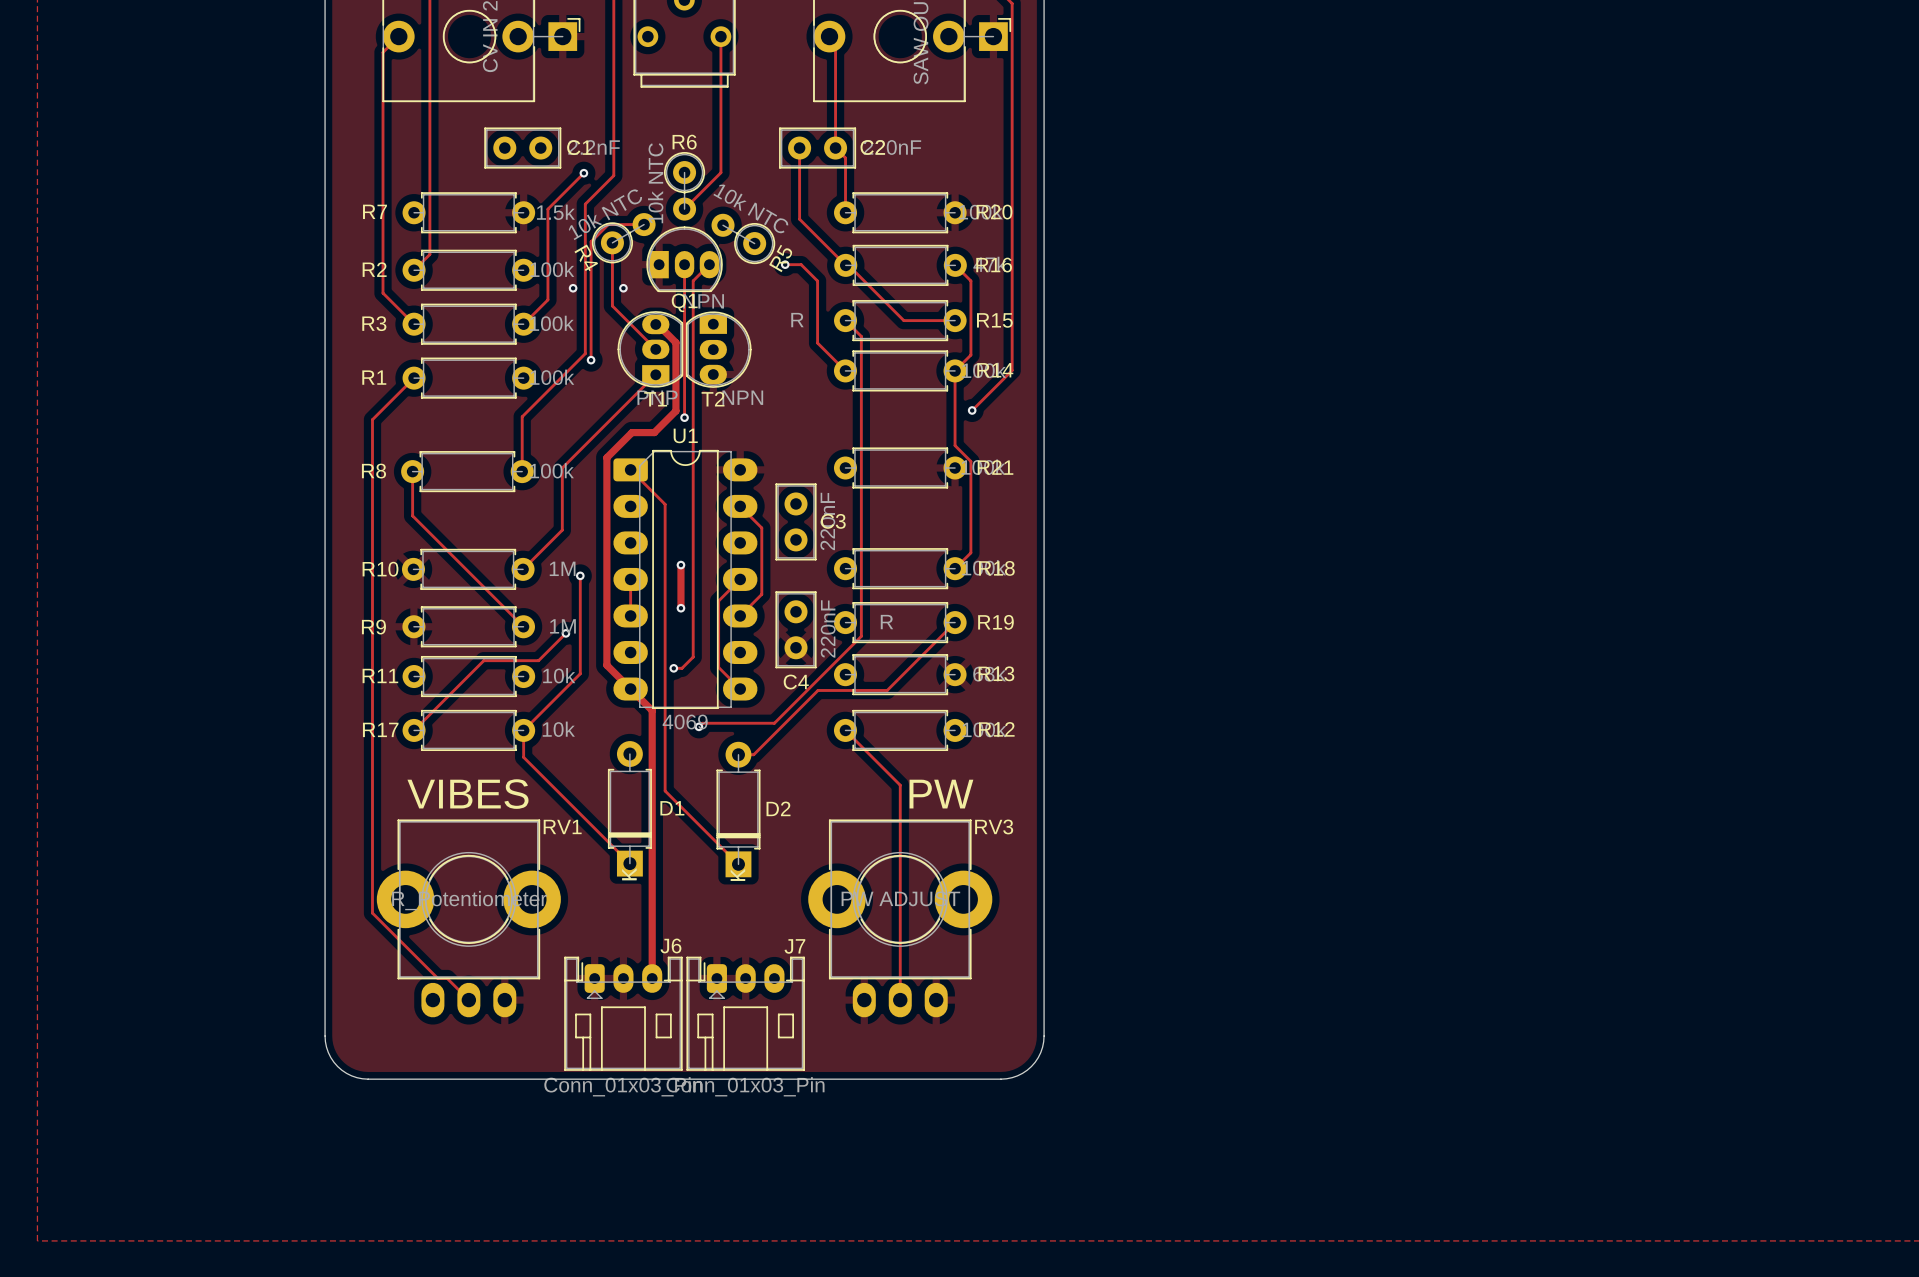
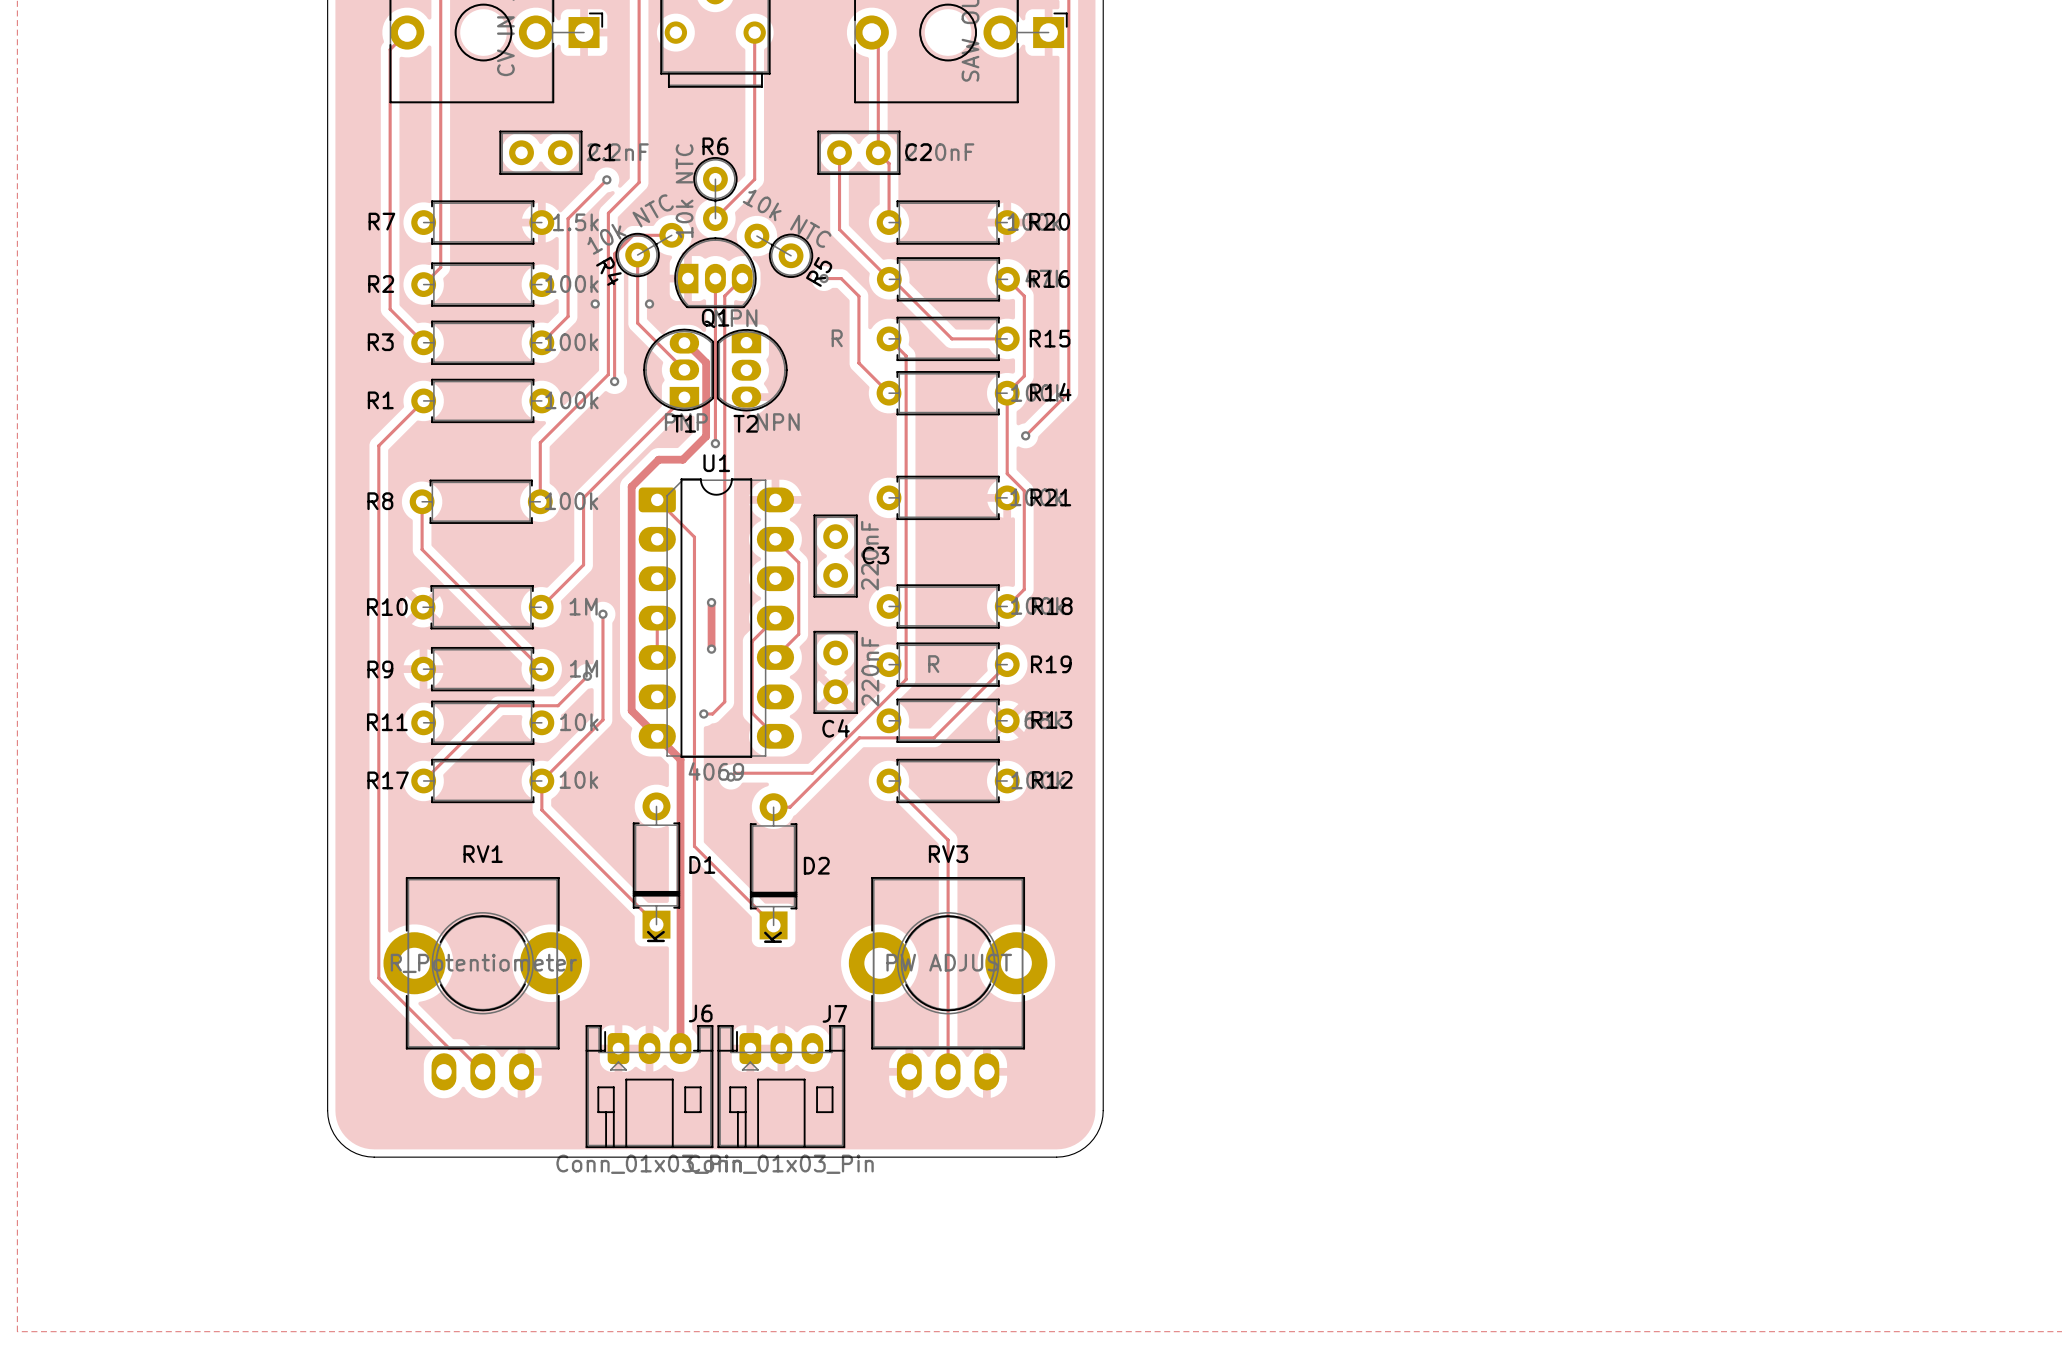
text: VIBES (467, 794) -> none
text: PW (941, 794) -> none
RV1 name position: RV1 (562, 826) -> RV1 (483, 854)
RV3 name position: RV3 (994, 826) -> RV3 (948, 854)

